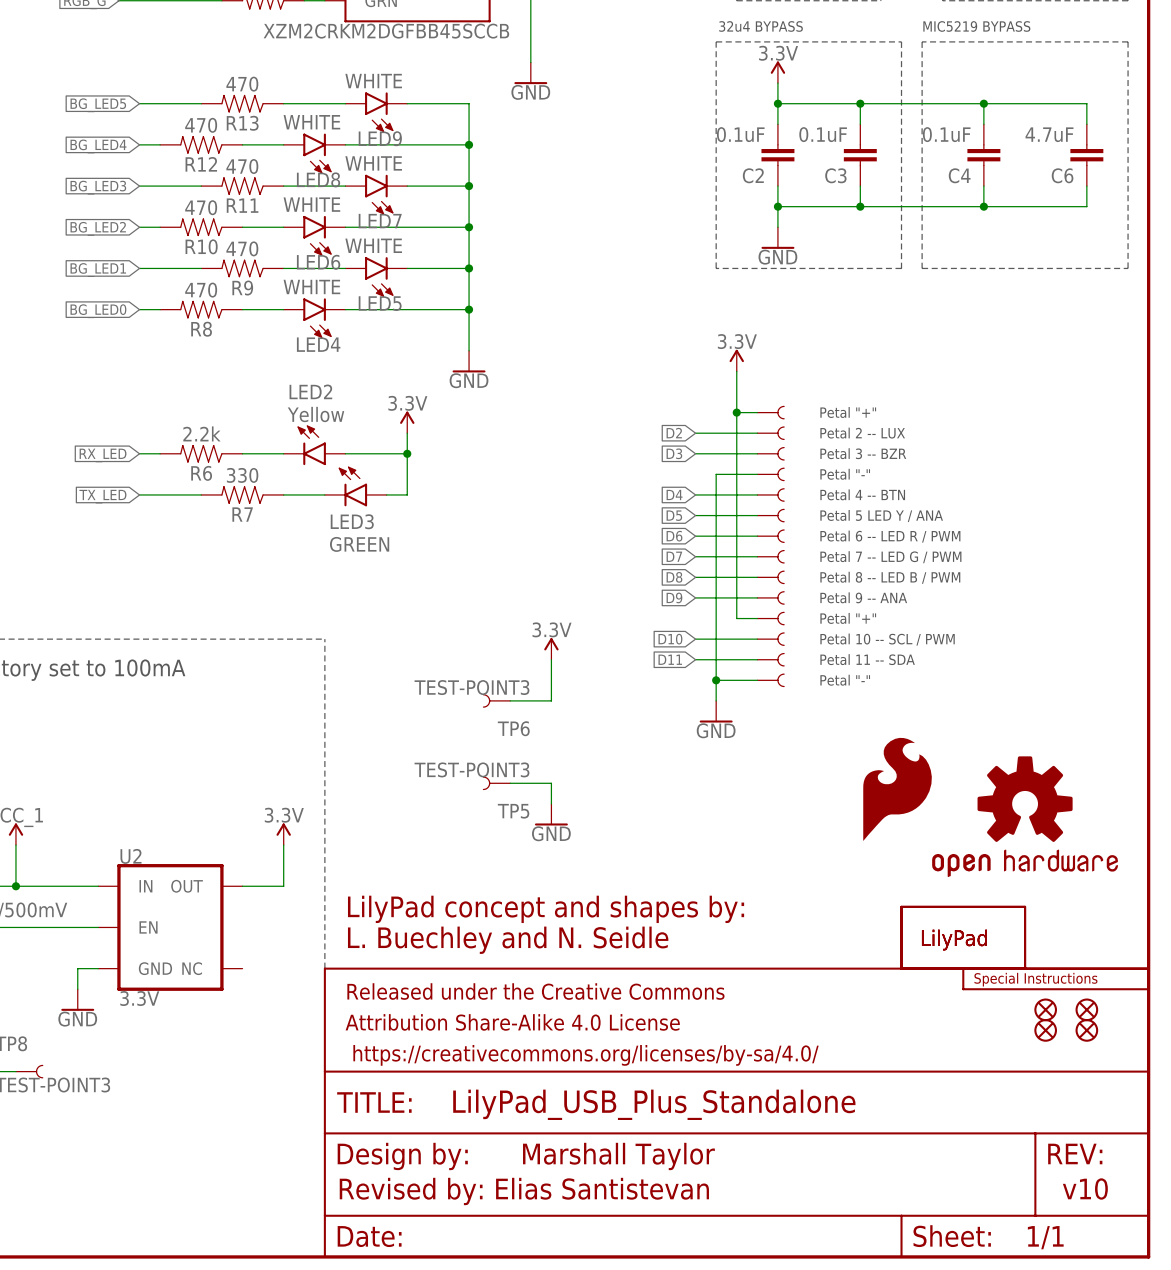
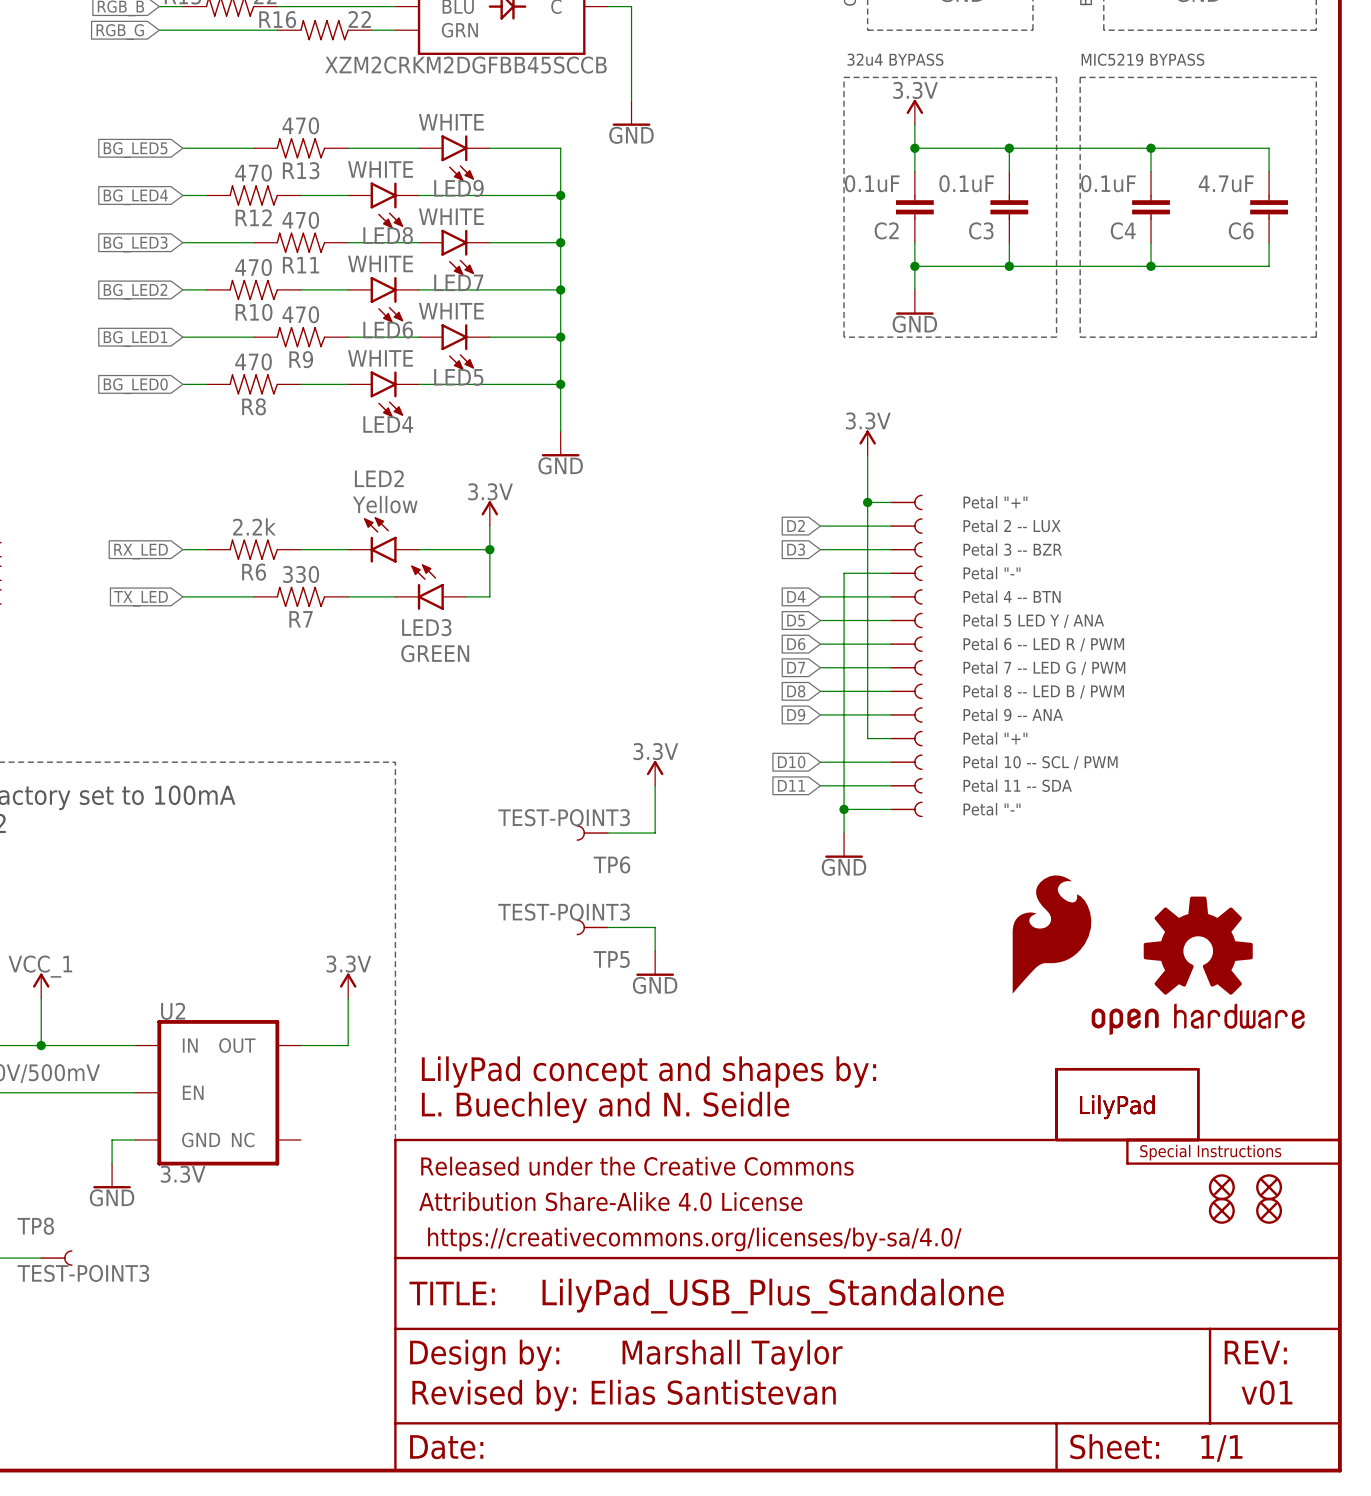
text: v10 (1085, 1189) -> v01 (1266, 1392)

